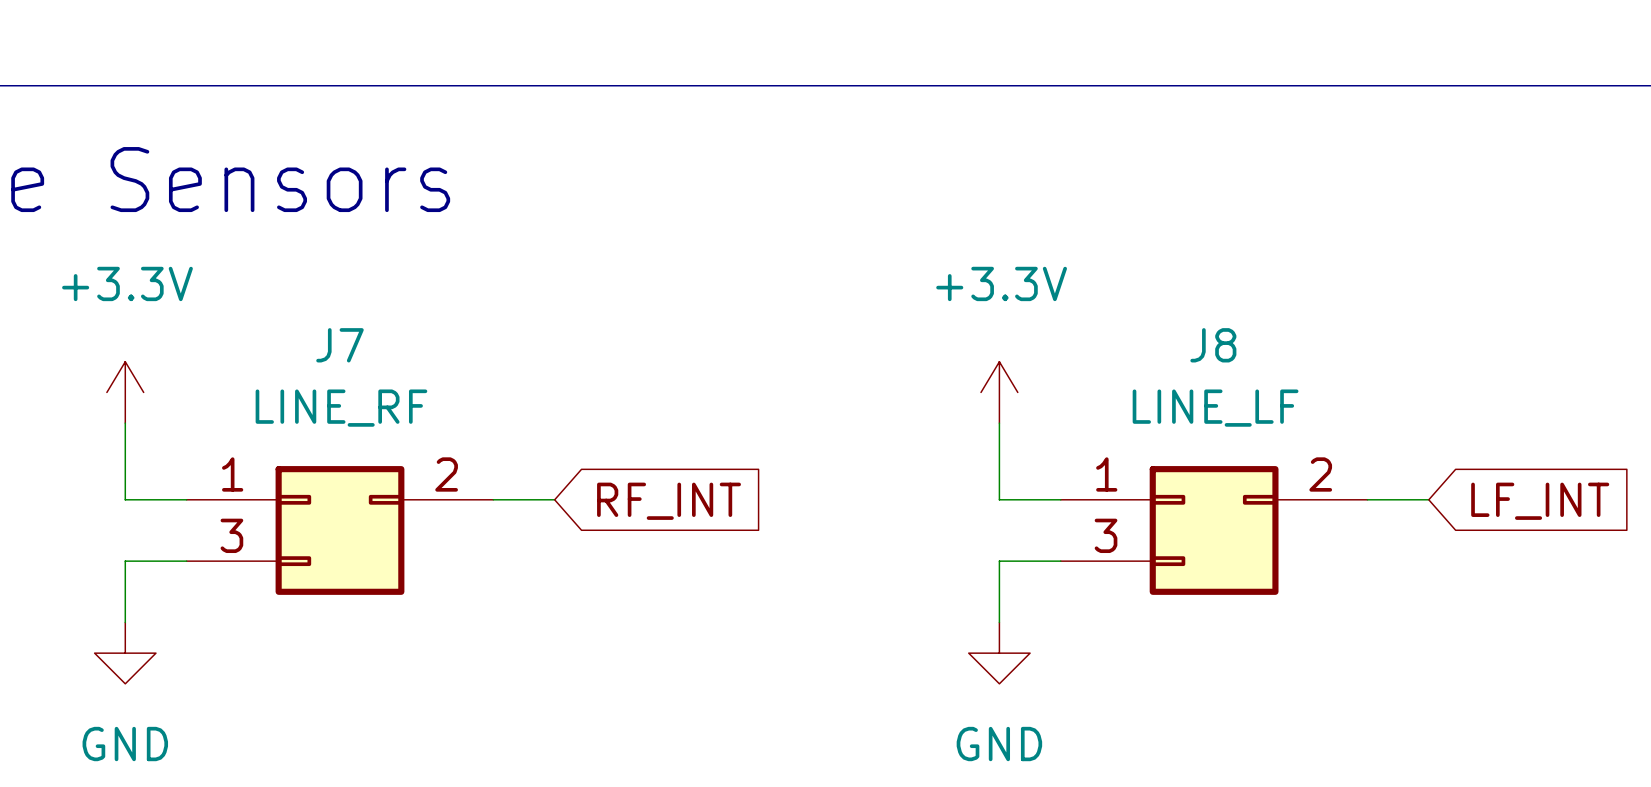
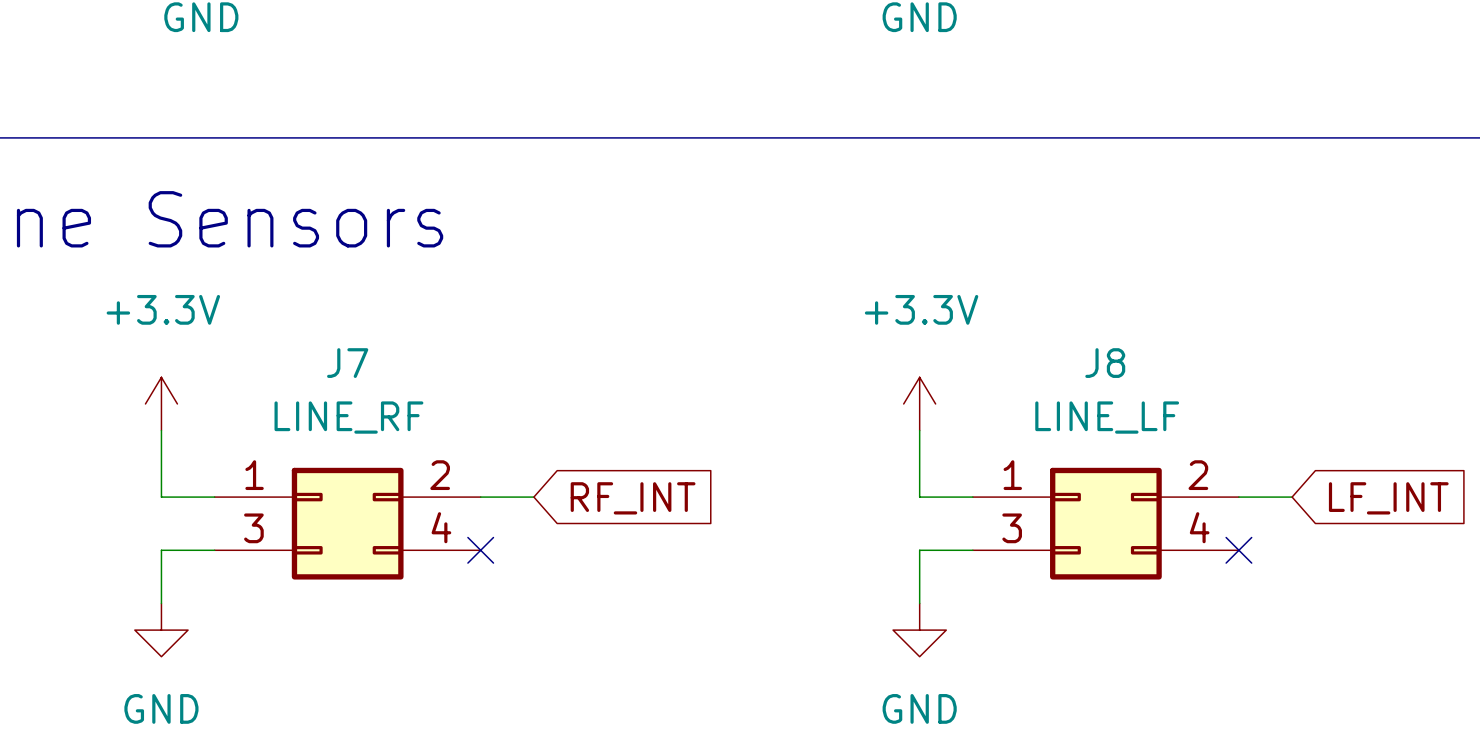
J7 symbol: [186, 466, 494, 595] -> [214, 467, 481, 580]
J8 symbol: [1060, 466, 1368, 595] -> [972, 467, 1239, 580]
no-connect mark: none -> (480, 550)
no-connect mark: none -> (1238, 550)

